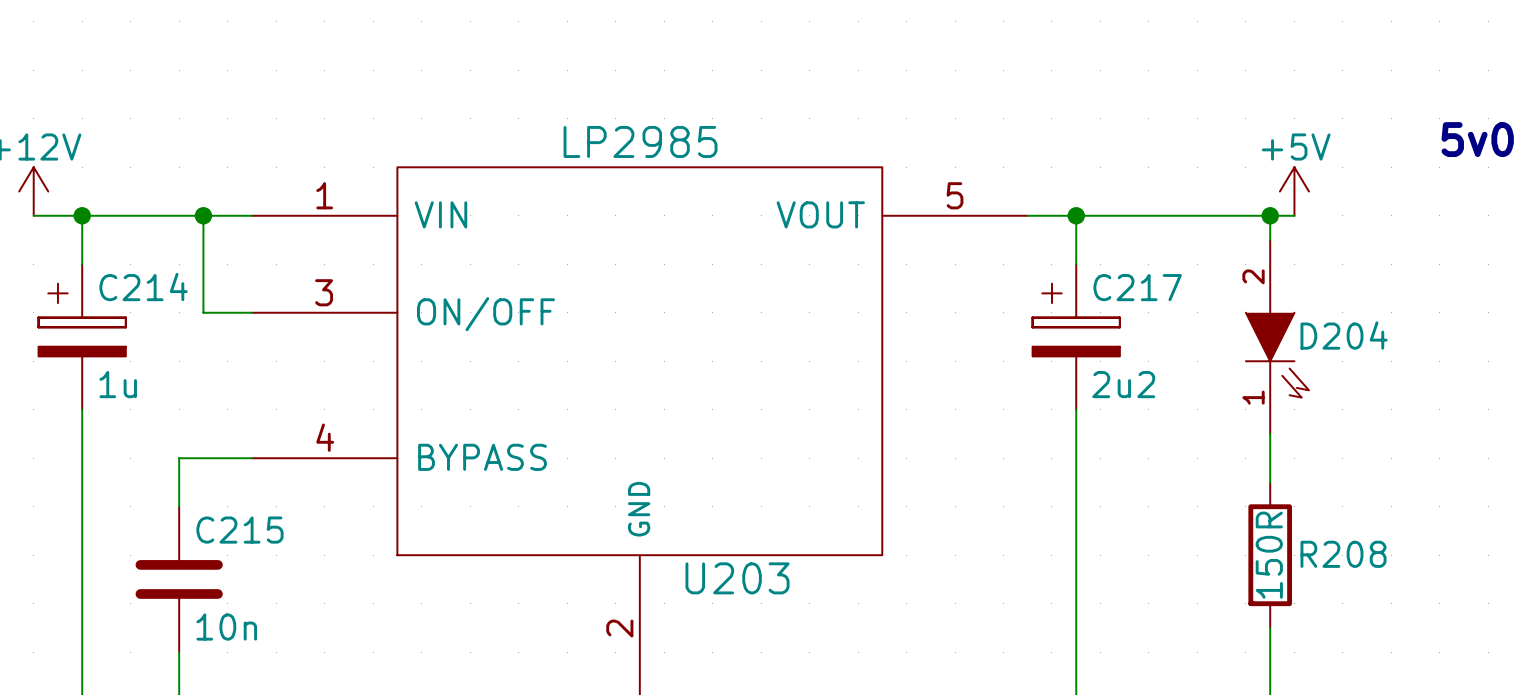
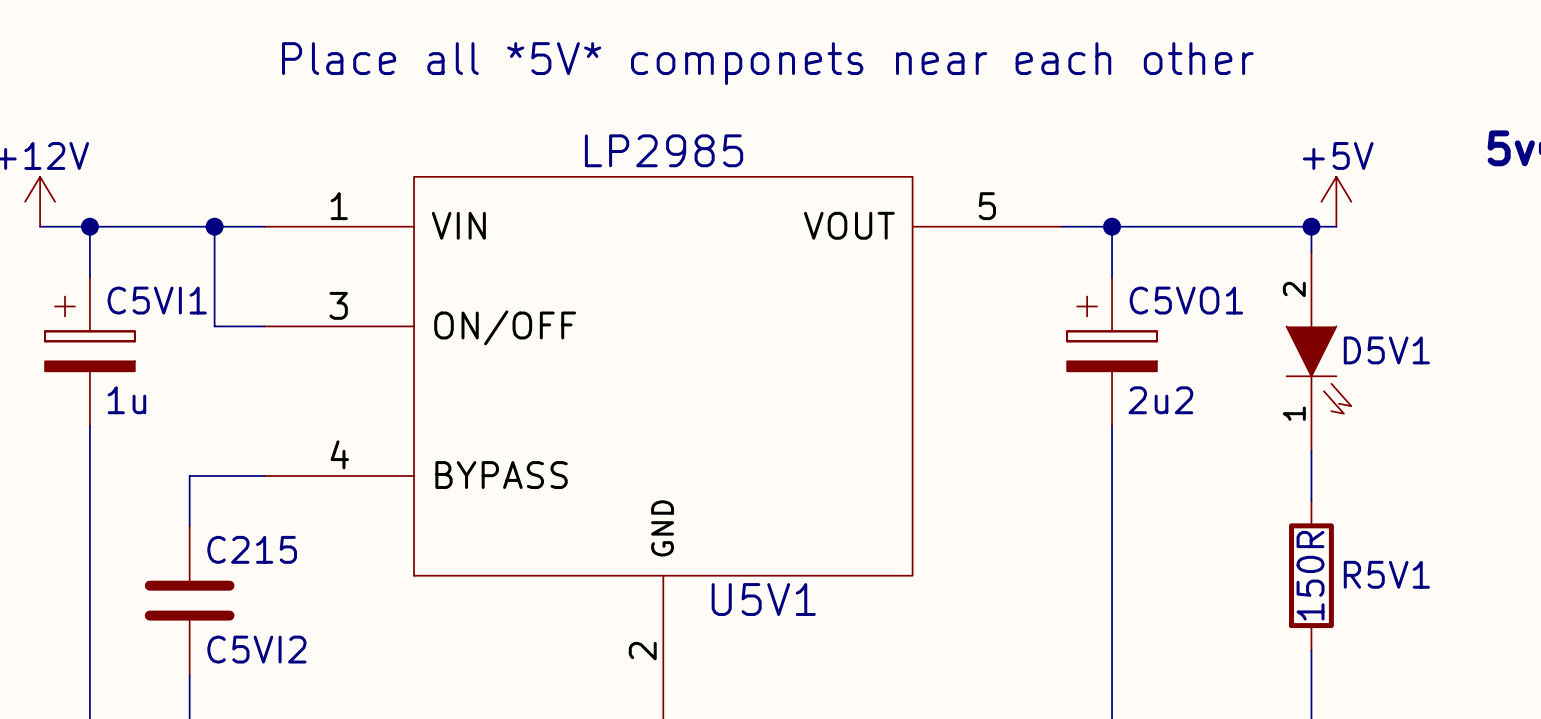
text: none -> Place all *5V* componets near each other (767, 63)
C214 name: C214 (143, 287) -> C5VI1 (157, 300)
C217 name: C217 (1137, 287) -> C5VO1 (1186, 300)
D204 name: D204 (1344, 335) -> D5V1 (1386, 350)
R208 name: R208 (1343, 554) -> R5V1 (1386, 574)
U203 name: U203 (737, 578) -> U5V1 (763, 599)
C215 value: 10n (226, 627) -> C5VI2 (256, 649)

